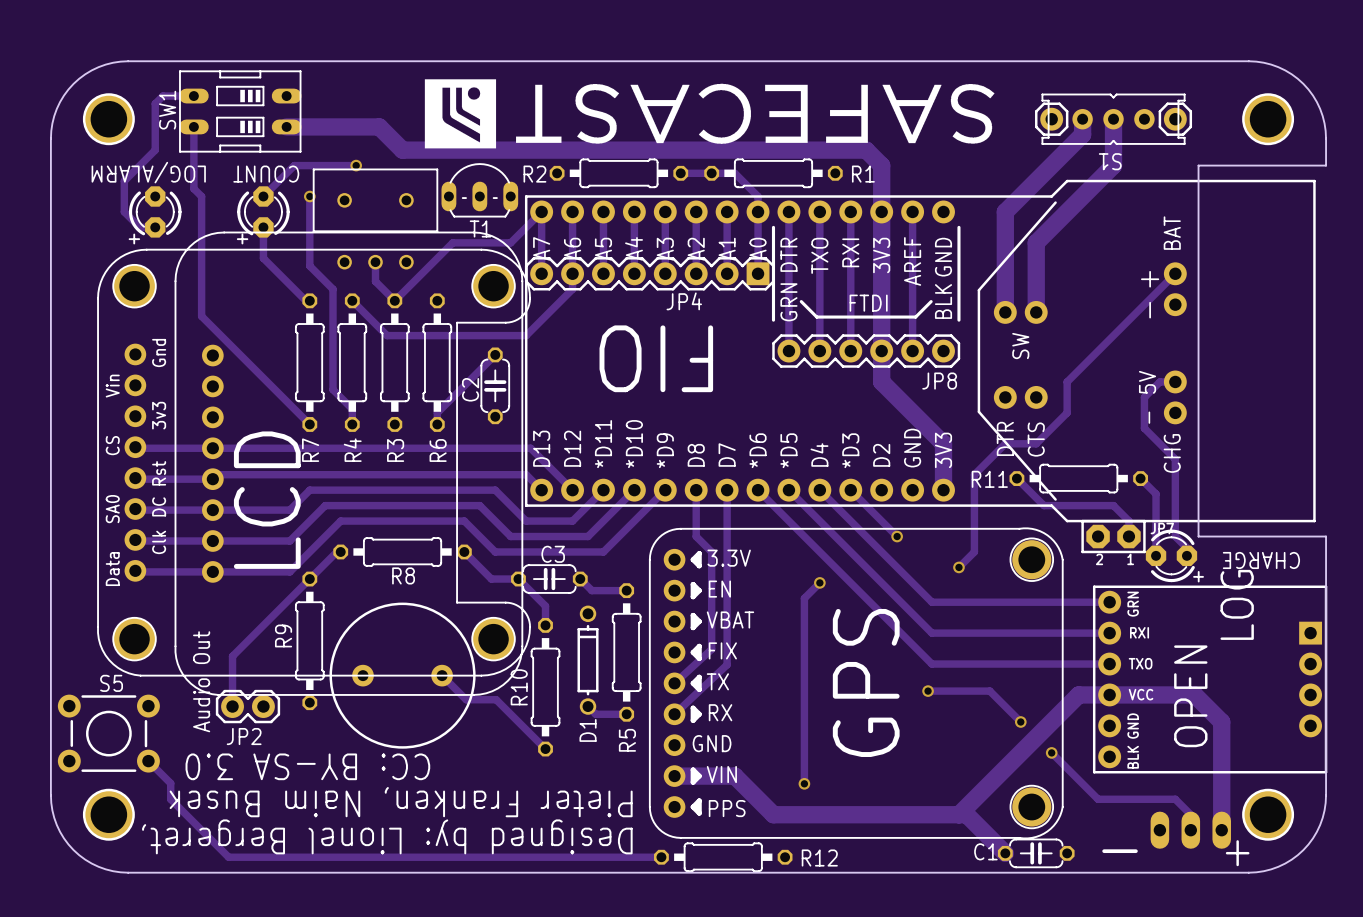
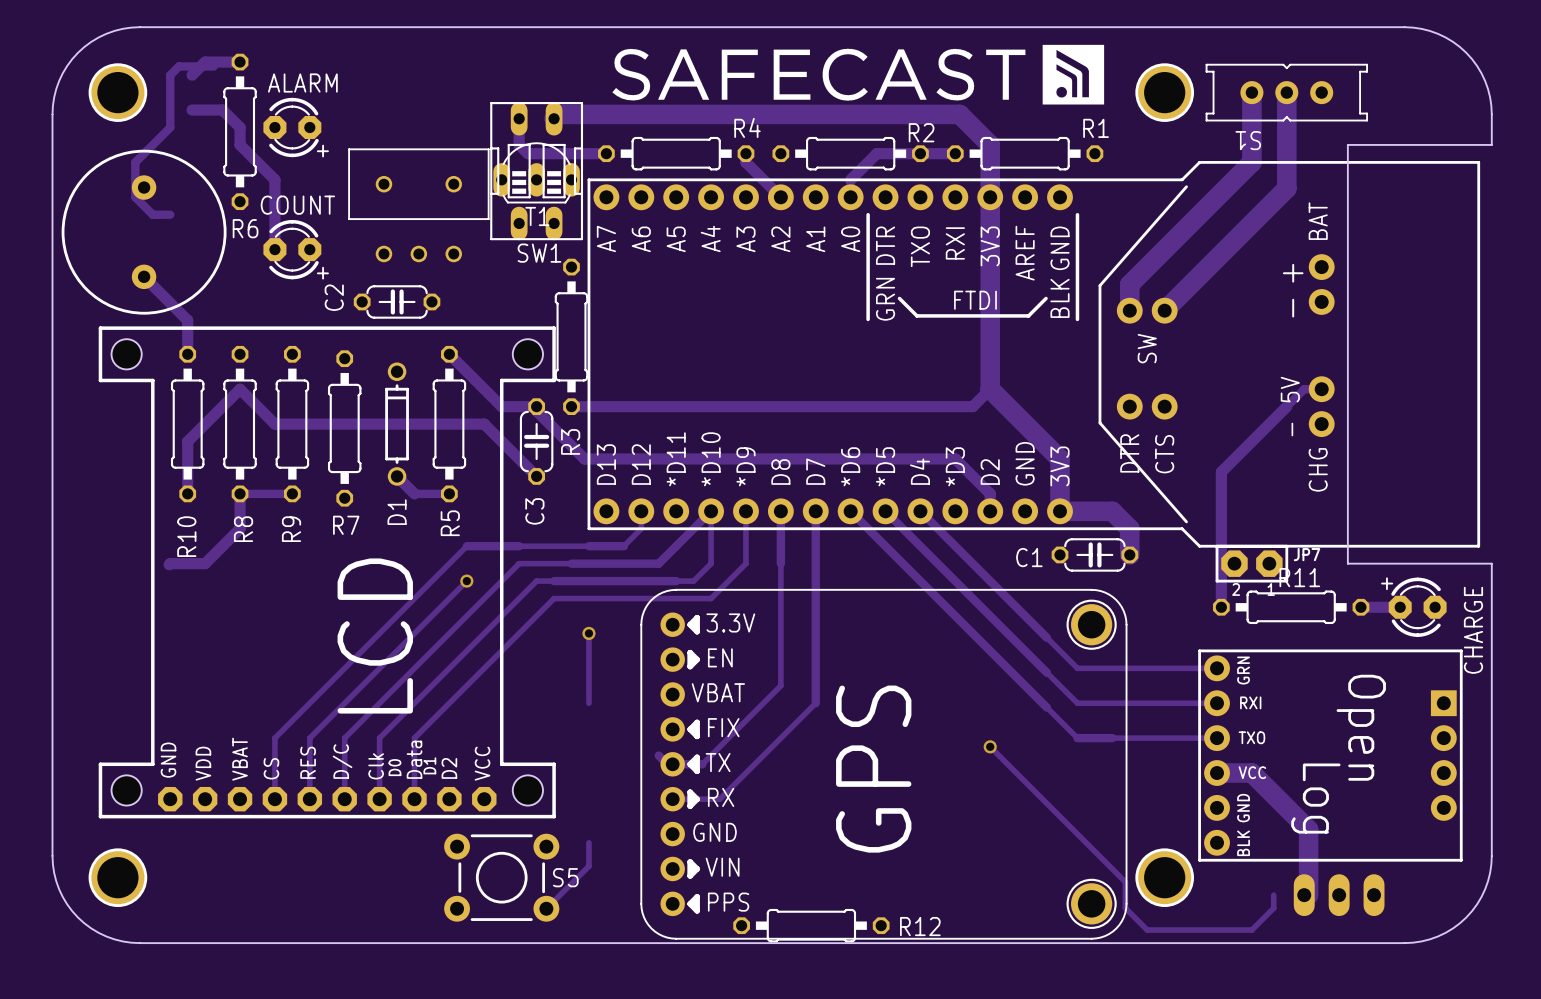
drawing: none -> [612, 44, 1105, 105]
drawing: [424, 79, 995, 149] -> none
track: none -> (240, 62) (205, 62) (192, 75)
SW1 name position: SW1 (167, 110) -> SW1 (539, 253)
SW1 rotation: 0° (240, 111) -> 90° clockwise (536, 171)
SW1 position: (240, 111) -> (536, 171)
part: (1051, 119) -> none
track: (1082, 119) (1082, 134) (1005, 211) (1005, 289) -> none
S1 position: (1113, 119) -> (1286, 92)
track: none -> (1286, 92) (1286, 188) (1164, 310)
part: (1175, 119) -> none
part position: (1268, 119) -> (1164, 92)
track: (193, 126) (193, 188) (201, 196) (201, 316) (309, 424) -> none
track: (286, 126) (379, 126) (402, 150) (866, 150) -> (554, 118) (558, 114) (959, 114) (972, 127)
track: none -> (192, 110) (222, 110) (240, 127) (240, 144) (274, 179) (274, 249)
track: none -> (519, 118) (519, 144) (527, 153) (606, 153)
ALARM: none -> (296, 127)
track: (356, 165) (294, 165) (263, 196) -> none
via: (356, 165) -> none
track: (1113, 165) (1036, 242) (1036, 312) -> (1251, 144) (1251, 162) (1129, 284)
R2 position: (618, 173) -> (850, 153)
track: (680, 173) (734, 173) (758, 196) -> (955, 153) (876, 153) (850, 179)
R1 position: (773, 173) -> (1025, 153)
R2 name position: R2 (534, 174) -> R2 (921, 132)
R1 name position: R1 (863, 174) -> R1 (1096, 128)
track: (309, 196) (309, 266) (332, 289) (332, 389) (352, 409) (352, 424) -> none
via: (309, 196) -> none
track: (572, 211) (572, 289) (526, 335) (387, 335) (352, 300) -> none
track: (603, 211) (603, 273) -> none
track: (634, 211) (634, 273) -> none
track: (665, 211) (665, 273) -> none
track: (696, 211) (696, 273) -> (780, 197) (745, 162) (745, 153)
track: (727, 211) (727, 273) -> none
track: (758, 211) (758, 273) -> none
track: (788, 211) (788, 351) -> none
track: (819, 211) (819, 351) -> none
track: (850, 211) (850, 351) -> none
track: (912, 211) (912, 351) -> none
LOG/ALARM: (155, 215) -> none
COUNT rotation: 0° (263, 215) -> 90° counterclockwise (296, 249)
COUNT position: (263, 215) -> (296, 249)
track: (263, 227) (263, 258) (305, 300) (309, 300) -> none
part: none -> (144, 232)
track: (375, 262) (375, 281) (394, 300) (452, 242) (510, 242) (541, 211) (541, 273) -> none
JP4: (649, 273) -> none
track: (1175, 273) (1067, 381) (1067, 412) (1036, 443) (1005, 443) (974, 474) (974, 551) (958, 567) -> none
track: none -> (144, 276) (187, 320) (187, 354)
track: none -> (449, 354) (501, 406) (536, 406) (536, 411) (584, 458) (955, 458) (990, 493) (990, 511)
JP8: (866, 351) -> none
track: (495, 354) (437, 412) (437, 424) -> none
text: FIO (656, 358) -> none
R7 position: (309, 362) -> (344, 428)
R4 rotation: 0° (352, 362) -> 90° clockwise (676, 153)
R4 position: (352, 362) -> (676, 153)
R3 position: (394, 362) -> (571, 336)
R6 position: (437, 362) -> (240, 131)
track: none -> (990, 389) (972, 406) (571, 406)
C2 rotation: 0° (495, 385) -> 90° counterclockwise (397, 301)
C2 position: (495, 385) -> (397, 301)
C2 name position: C2 (470, 389) -> C2 (334, 297)
track: (1144, 397) (1144, 428) (1175, 459) (1175, 536) (1186, 548) (1186, 555) -> (1286, 406) (1221, 472) (1221, 607)
track: (135, 447) (530, 448) (572, 490) -> none
R7 name rotation: 0° (310, 450) -> 90° clockwise (346, 525)
R4 name position: R4 (352, 450) -> R4 (747, 127)
R3 name position: R3 (395, 450) -> R3 (570, 441)
R6 name rotation: 0° (438, 450) -> 90° clockwise (245, 228)
track: none -> (536, 476) (484, 424) (274, 424) (240, 389) (187, 441) (187, 493)
part: (314, 462) -> none
part: (348, 463) -> none
track: (217, 474) (212, 479) (135, 478) -> (240, 493) (240, 528) (205, 563) (169, 564)
track: (263, 474) (371, 474) -> (397, 476) (414, 493)
track: (402, 474) (526, 474) (541, 490) -> none
track: (1016, 478) (1043, 505) (1113, 505) (1128, 521) (1128, 536) -> none
R11 position: (1078, 478) -> (1291, 607)
track: (1140, 478) (1156, 494) (1156, 555) -> none
R11 name position: R11 (989, 479) -> R11 (1299, 577)
track: (603, 490) (572, 521) (557, 521) -> (641, 511) (641, 528) (623, 546)
track: (665, 490) (603, 551) -> (711, 511) (711, 563) (693, 581) (676, 581)
track: none -> (745, 511) (745, 563) (711, 598) (554, 598) (414, 738) (414, 799)
track: (850, 490) (897, 536) -> none
track: none -> (1060, 511) (1112, 511) (1129, 528) (1129, 554)
text: LCD (267, 500) -> none
track: (135, 509) (289, 510) (309, 490) (495, 490) (526, 521) -> none
track: (418, 521) (340, 521) (289, 571) (135, 570) -> (466, 546) (274, 738) (274, 799)
track: (464, 521) (495, 551) -> (519, 546) (588, 546)
track: (510, 536) (479, 505) (325, 505) (289, 541) (135, 539) -> (571, 563) (519, 563) (344, 738) (344, 799)
track: (696, 536) (711, 551) (711, 649) (674, 683) -> (780, 563) (780, 685) (702, 764)
via: (897, 536) -> none
part: none -> LCD (327, 572)
track: (340, 551) (336, 551) (232, 656) (232, 706) -> none
R8 rotation: 0° (402, 551) -> 90° clockwise (240, 424)
R8 position: (402, 551) -> (240, 424)
track: none -> (466, 581) (309, 738) (309, 799)
via: none -> (466, 581)
track: (464, 551) (491, 579) (518, 579) (545, 606) (545, 625) -> none
track: none -> (554, 581) (536, 581) (379, 738) (379, 799)
C3 name position: C3 (553, 554) -> C3 (534, 511)
CHARGE rotation: 0° (1174, 555) -> 180° (1413, 607)
CHARGE position: (1174, 555) -> (1413, 607)
CHARGE name position: CHARGE (1261, 560) -> CHARGE (1473, 630)
via: (958, 567) -> none
R8 name position: R8 (403, 575) -> R8 (243, 529)
track: none -> (1360, 607) (1400, 607)
C3 rotation: 0° (549, 579) -> 90° counterclockwise (536, 441)
C3 position: (549, 579) -> (536, 441)
track: (580, 579) (591, 590) (626, 590) -> none
track: (819, 582) (804, 598) (804, 783) -> none
via: (819, 582) -> none
track: none -> (588, 633) (588, 703)
via: none -> (588, 633)
track: (931, 602) (1109, 602) -> (1046, 637) (1077, 668) (1217, 668)
text: LOG (1237, 604) -> none
track: (931, 633) (1109, 633) -> (1046, 672) (1077, 703) (1217, 703)
R9 name position: R9 (283, 635) -> R9 (291, 529)
R9 position: (309, 640) -> (292, 424)
R5 position: (626, 652) -> (449, 424)
D1 position: (588, 660) -> (397, 424)
track: (727, 660) (727, 664) (674, 714) -> (815, 703) (719, 799) (672, 799)
track: (931, 664) (1109, 664) -> none
part: (402, 675) -> none
track: (442, 675) (466, 699) (496, 699) (545, 749) -> none
part: (1210, 679) -> none
text: Audio Out (201, 681) -> none
text: GPS (866, 682) -> none
S5 name position: S5 (111, 683) -> S5 (565, 877)
part: (856, 683) -> none
R10 name position: R10 (519, 687) -> R10 (186, 536)
R10 position: (545, 687) -> (187, 424)
track: (928, 691) (958, 691) -> (1046, 707) (1077, 738)
via position: (928, 691) -> (990, 746)
track: (989, 691) (1020, 722) -> (1112, 738) (1217, 738)
text: OPEN (1190, 696) -> none
track: none -> (990, 746) (1125, 882) (1125, 908) (1147, 930) (1251, 930) (1273, 908) (1273, 895)
JP2: (247, 706) -> none
part: none -> (1330, 755)
part: none -> GPS (883, 764)
via: (1020, 722) -> none
track: none -> (1217, 773) (1251, 773) (1308, 829) (1308, 895)
D1 name position: D1 (588, 730) -> D1 (397, 512)
S5 position: (108, 733) -> (501, 877)
track: (1051, 752) (1098, 799) (1175, 799) (1190, 814) (1190, 830) -> none
via: (1051, 752) -> none
track: (148, 761) (170, 783) (170, 799) (228, 857) (661, 857) -> none
text: CC: BY-SA 3.0 (307, 766) -> none
track: (674, 776) (734, 776) (773, 814) (966, 814) (1005, 853) -> none
track: none -> (588, 842) (588, 866) (546, 908)
via: (804, 783) -> none
text: Pieter Franken, Naim Busek (401, 802) -> none
track: (958, 814) (1078, 694) (1194, 694) (1221, 722) (1221, 830) -> none
part position: (1268, 814) -> (1164, 877)
text: Designed by: Lionel Bergeret, (387, 836) -> none
text: - (1120, 851) -> none
C1 rotation: 0° (1036, 853) -> 180° (1094, 554)
C1 position: (1036, 853) -> (1094, 554)
text: + (1237, 853) -> none

